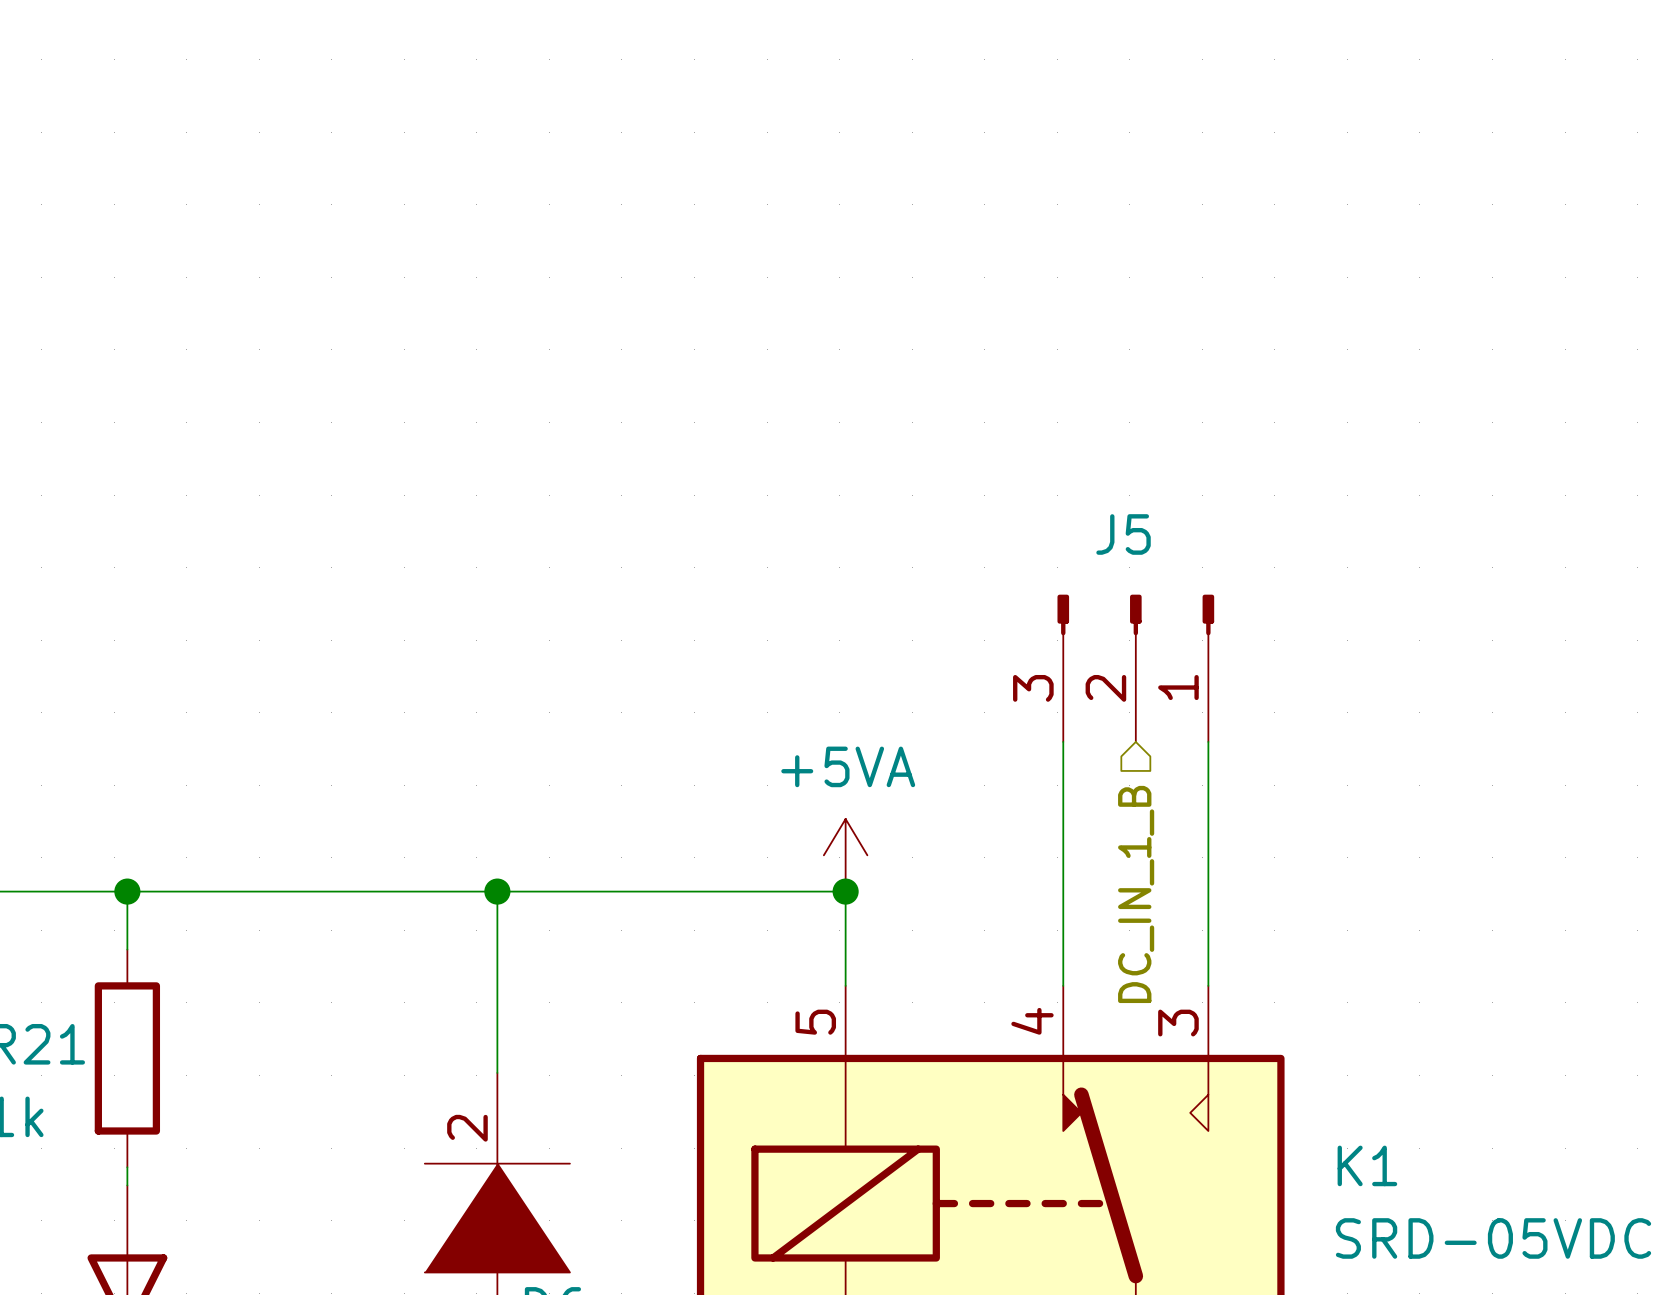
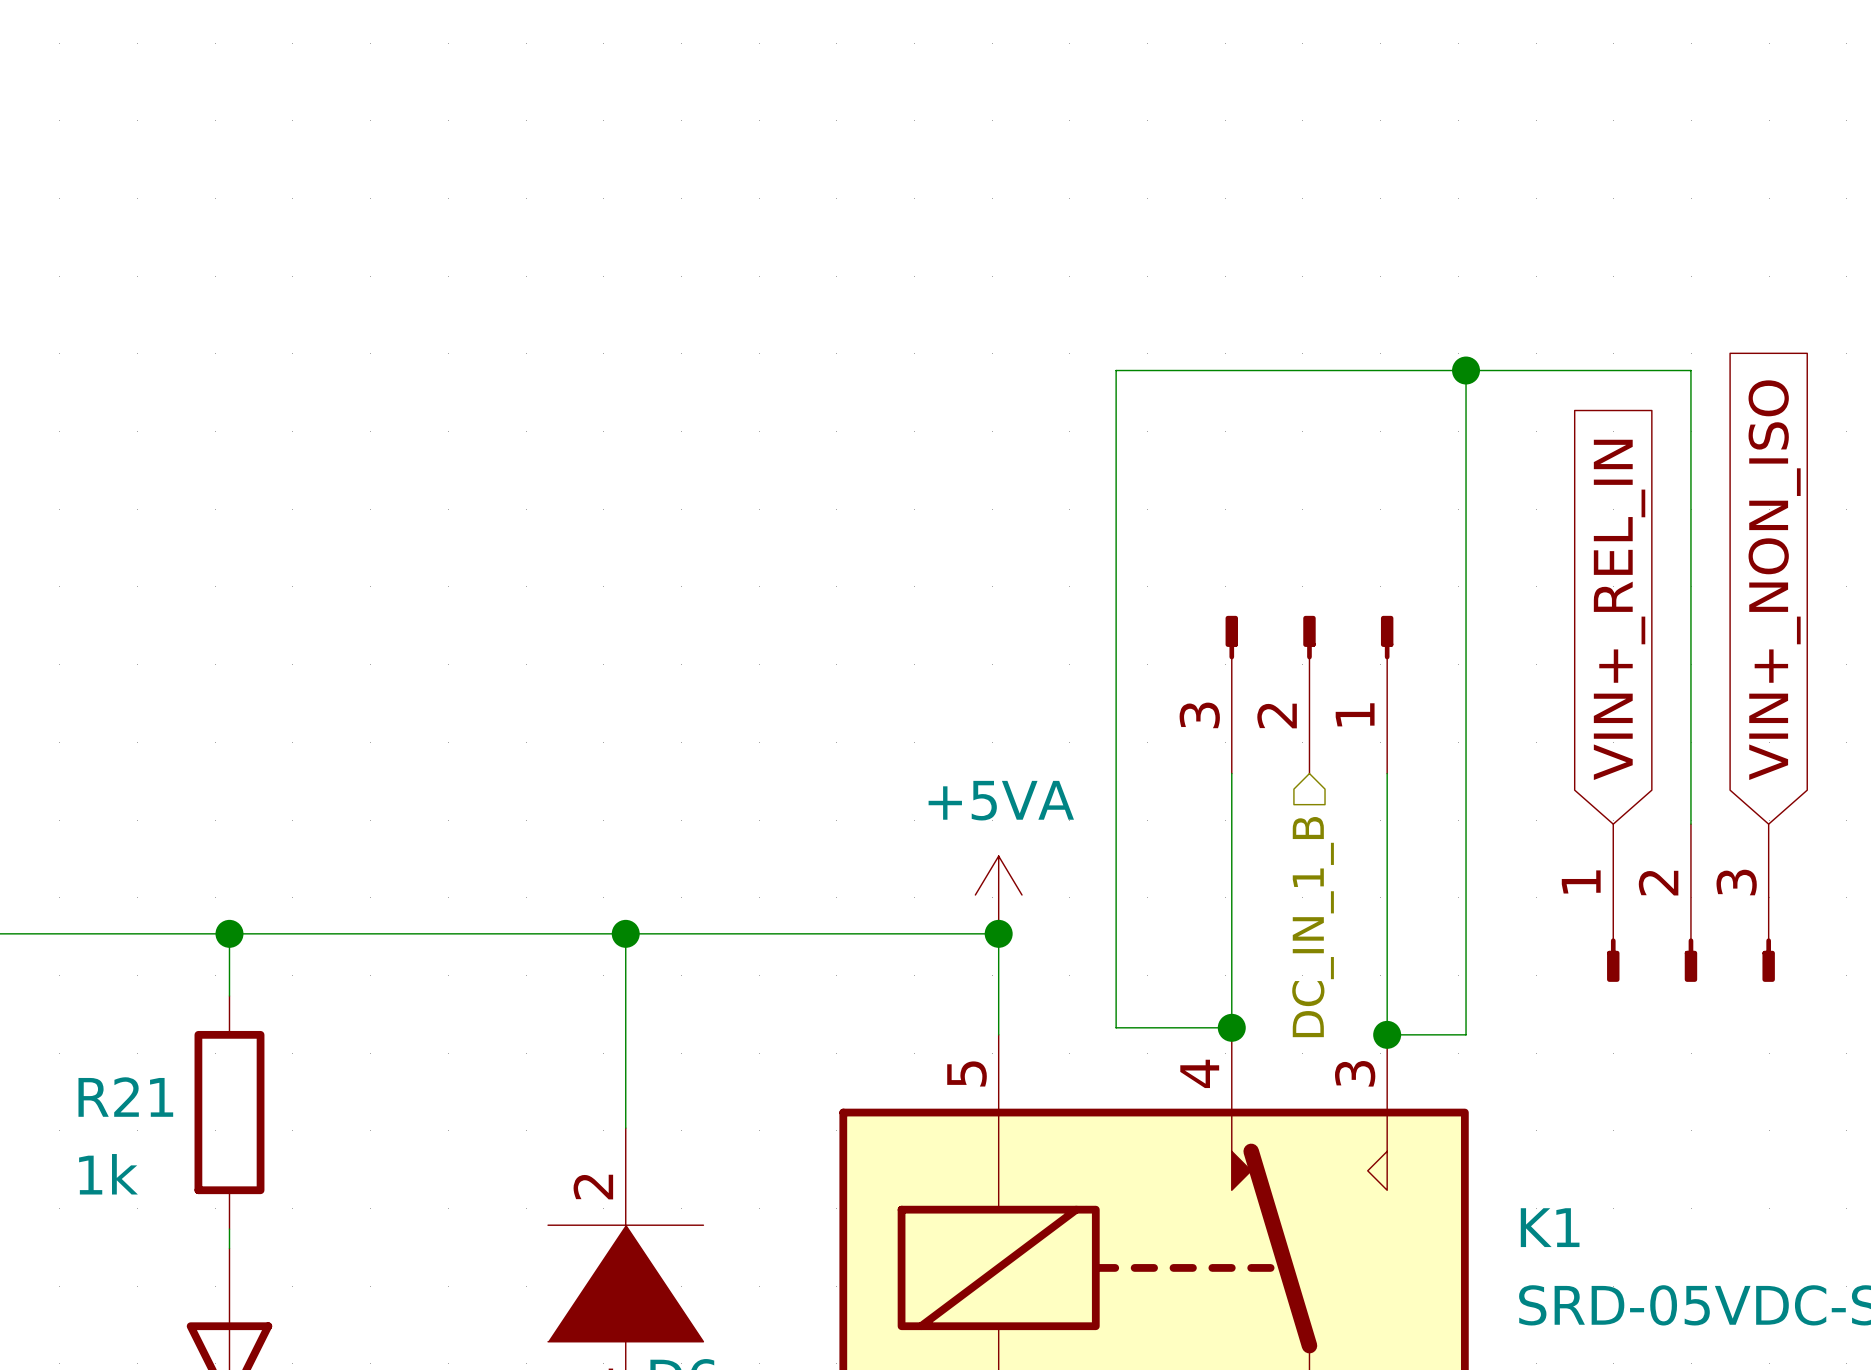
wire: none -> (1466, 370) (1466, 1034) (1387, 1034)
junction: none -> (1466, 370)
J5 name: J5 (1123, 534) -> none
global label: none -> VIN+_NON_ISO (1774, 580)
global label: none -> VIN+_REL_IN (1619, 609)
wire: none -> (1690, 824) (1690, 370) (1116, 370) (1116, 1027) (1231, 1027)
part: none -> (1690, 903)
junction: none -> (1231, 1027)
junction: none -> (1387, 1034)

